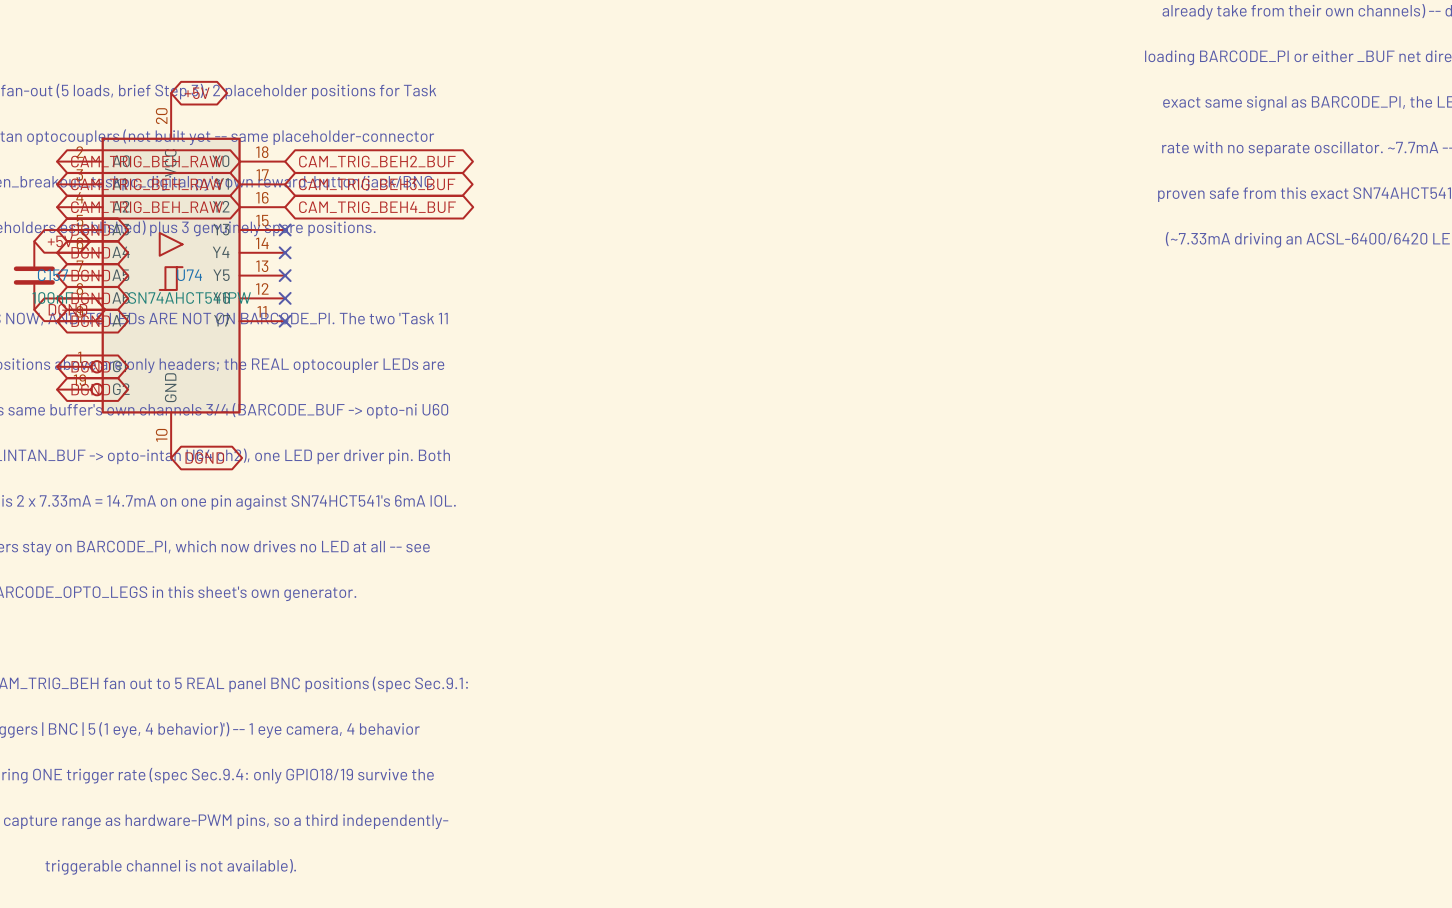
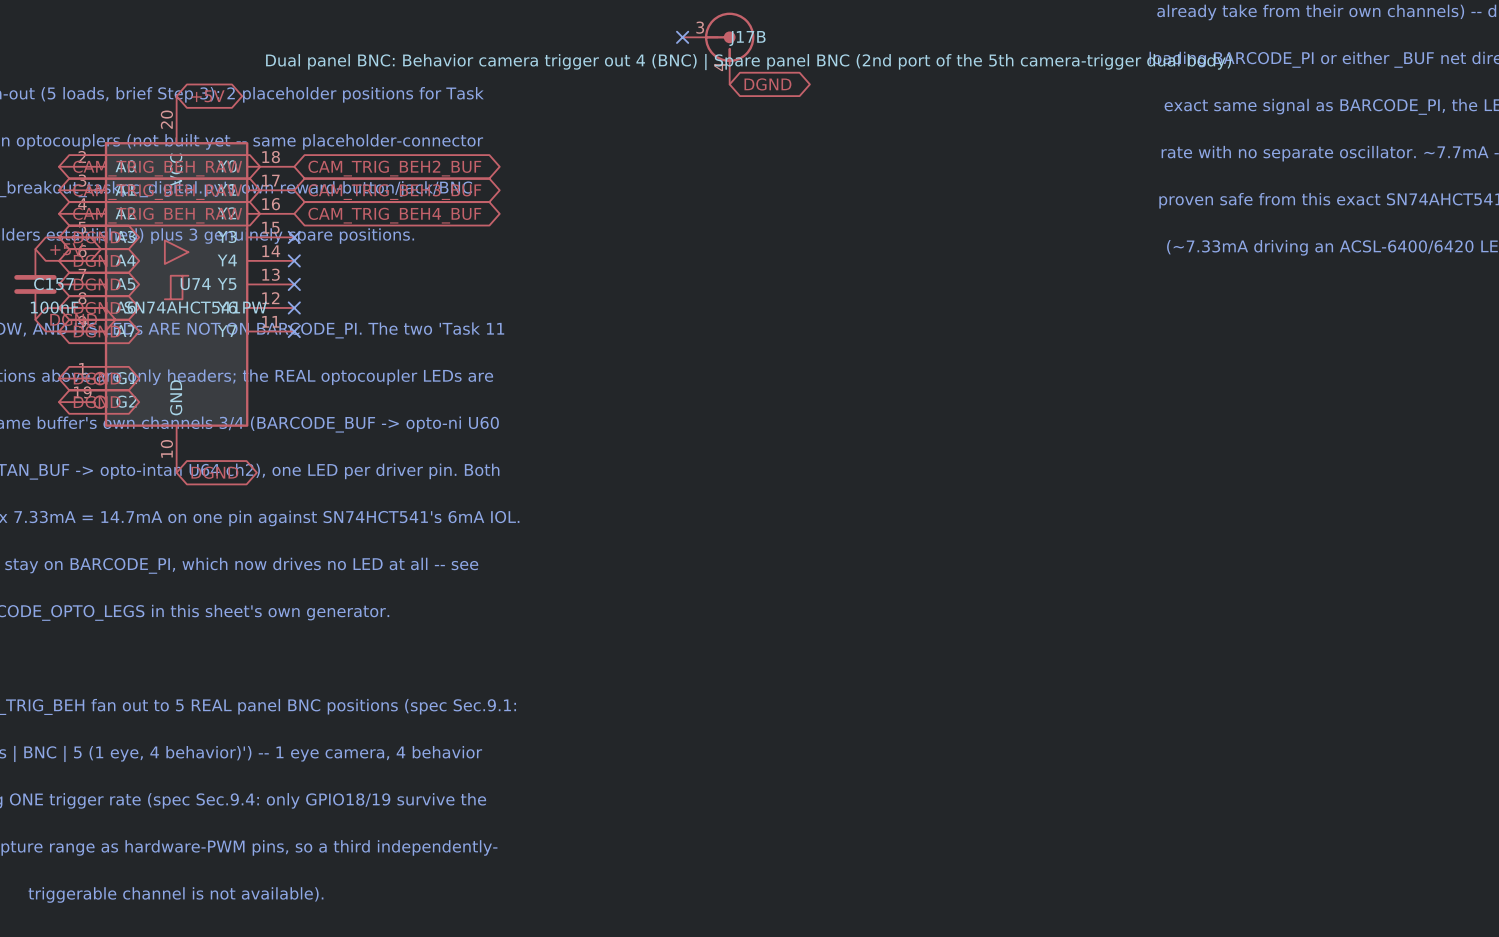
no-connect mark: none -> (682, 37)
J17B: none -> Dual panel BNC: Behavior camera trigger out 4 (BNC) | Spare panel BNC (2nd port of the 5th camera-trigger dual body) (718, 48)
global label: none -> DGND (767, 84)

